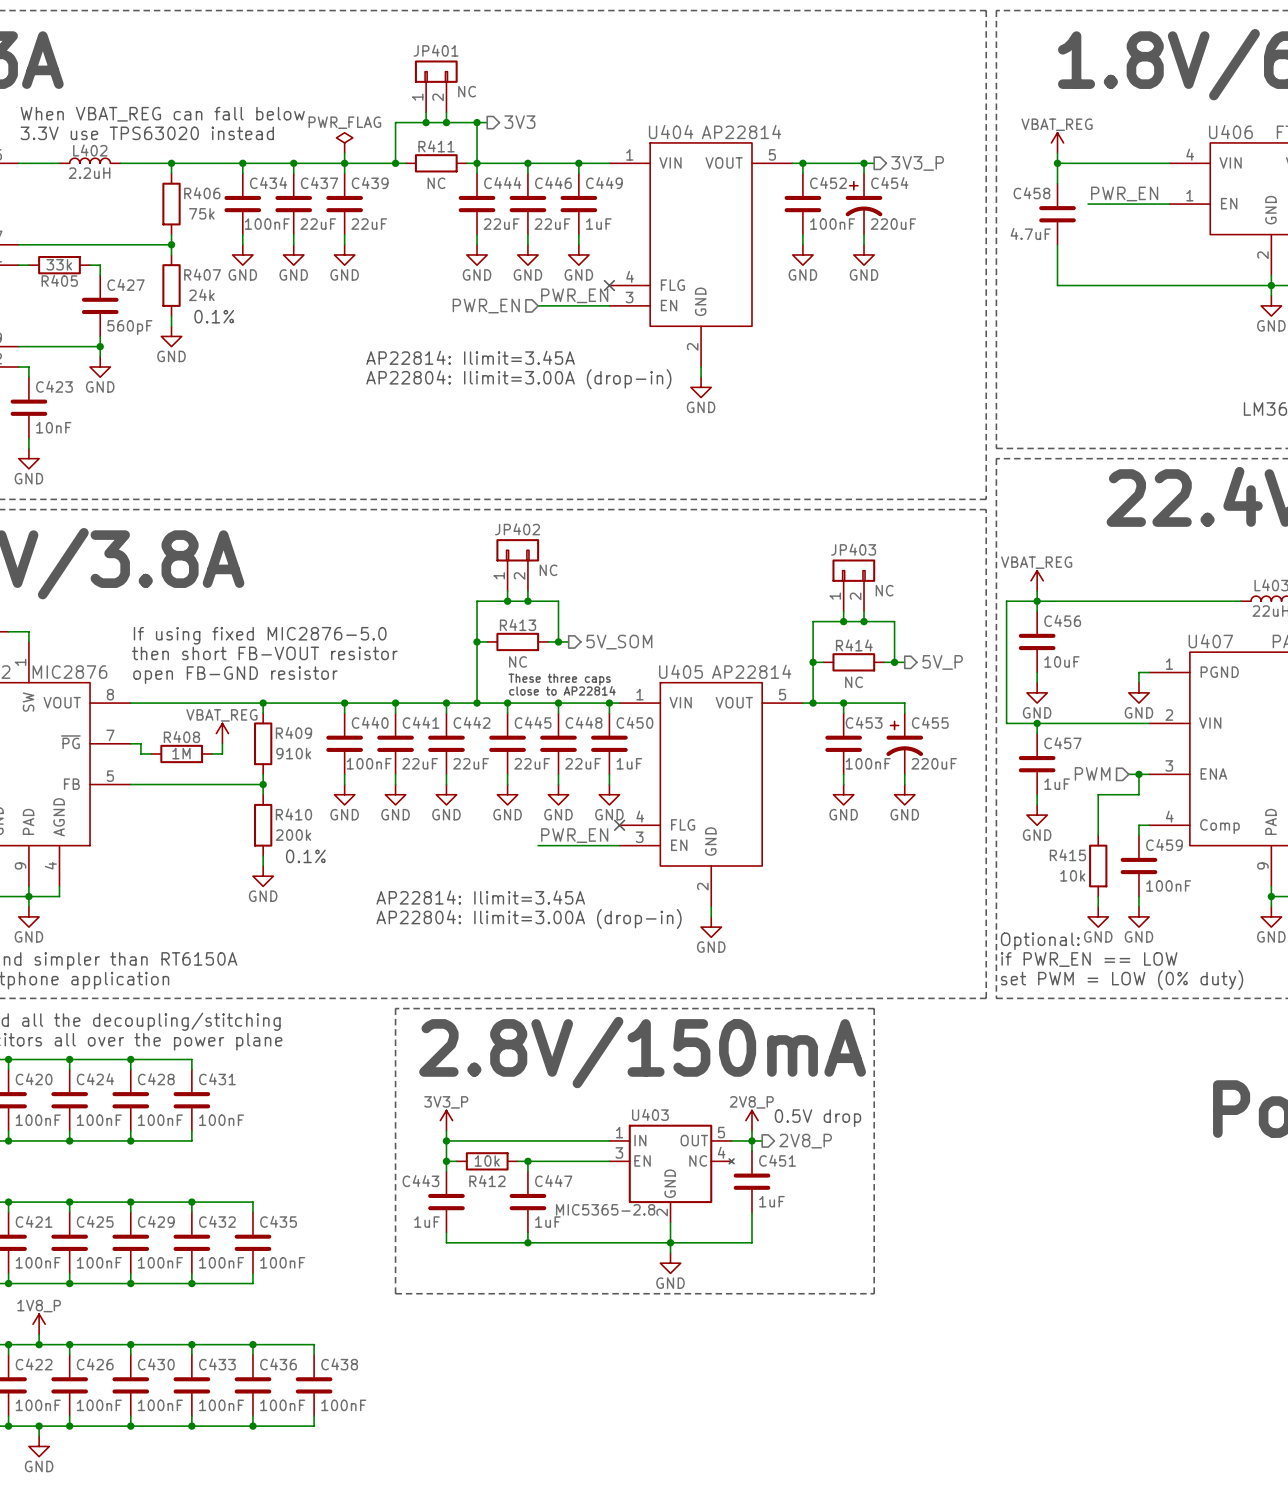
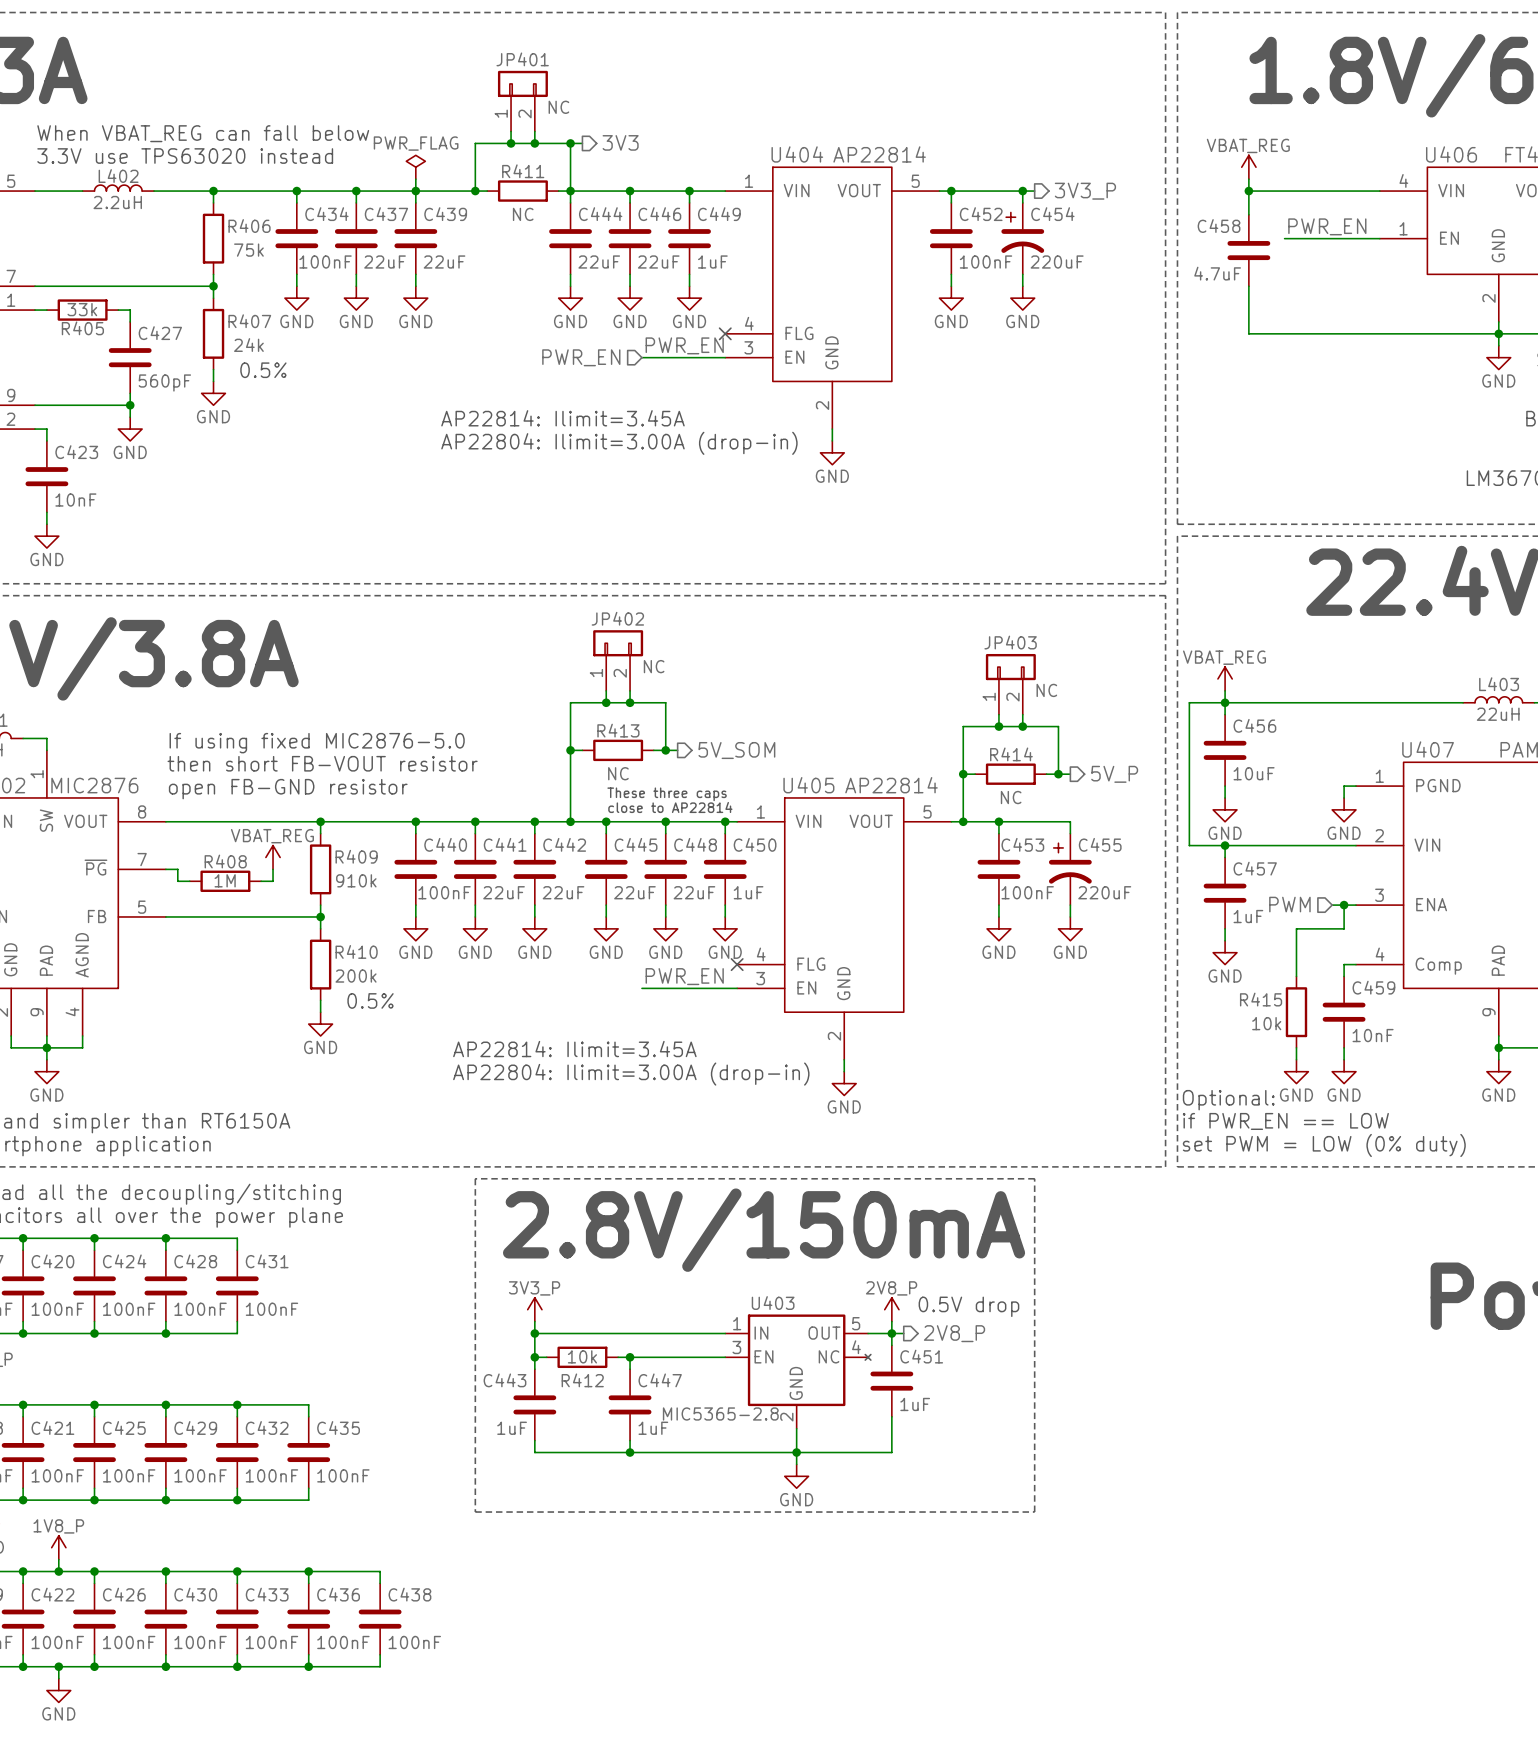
text: 0.1% (214, 316) -> 0.5% (263, 370)
text: 0.1% (305, 856) -> 0.5% (370, 1000)
C459 value: 100nF (1168, 885) -> 10nF (1373, 1035)

